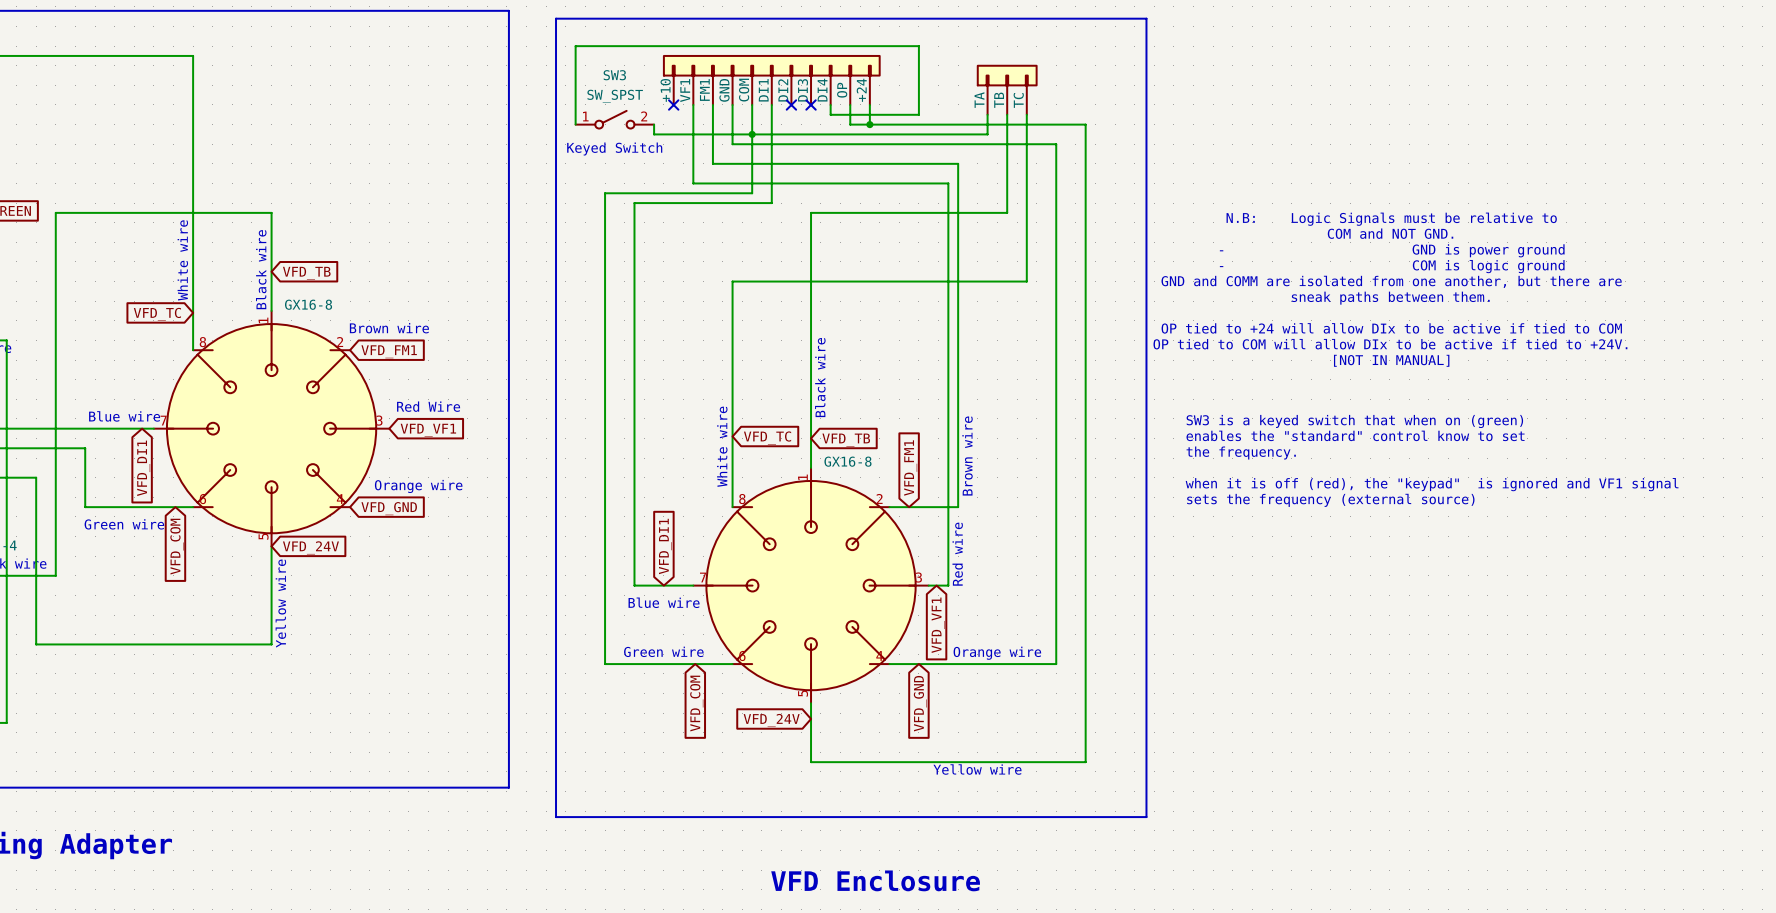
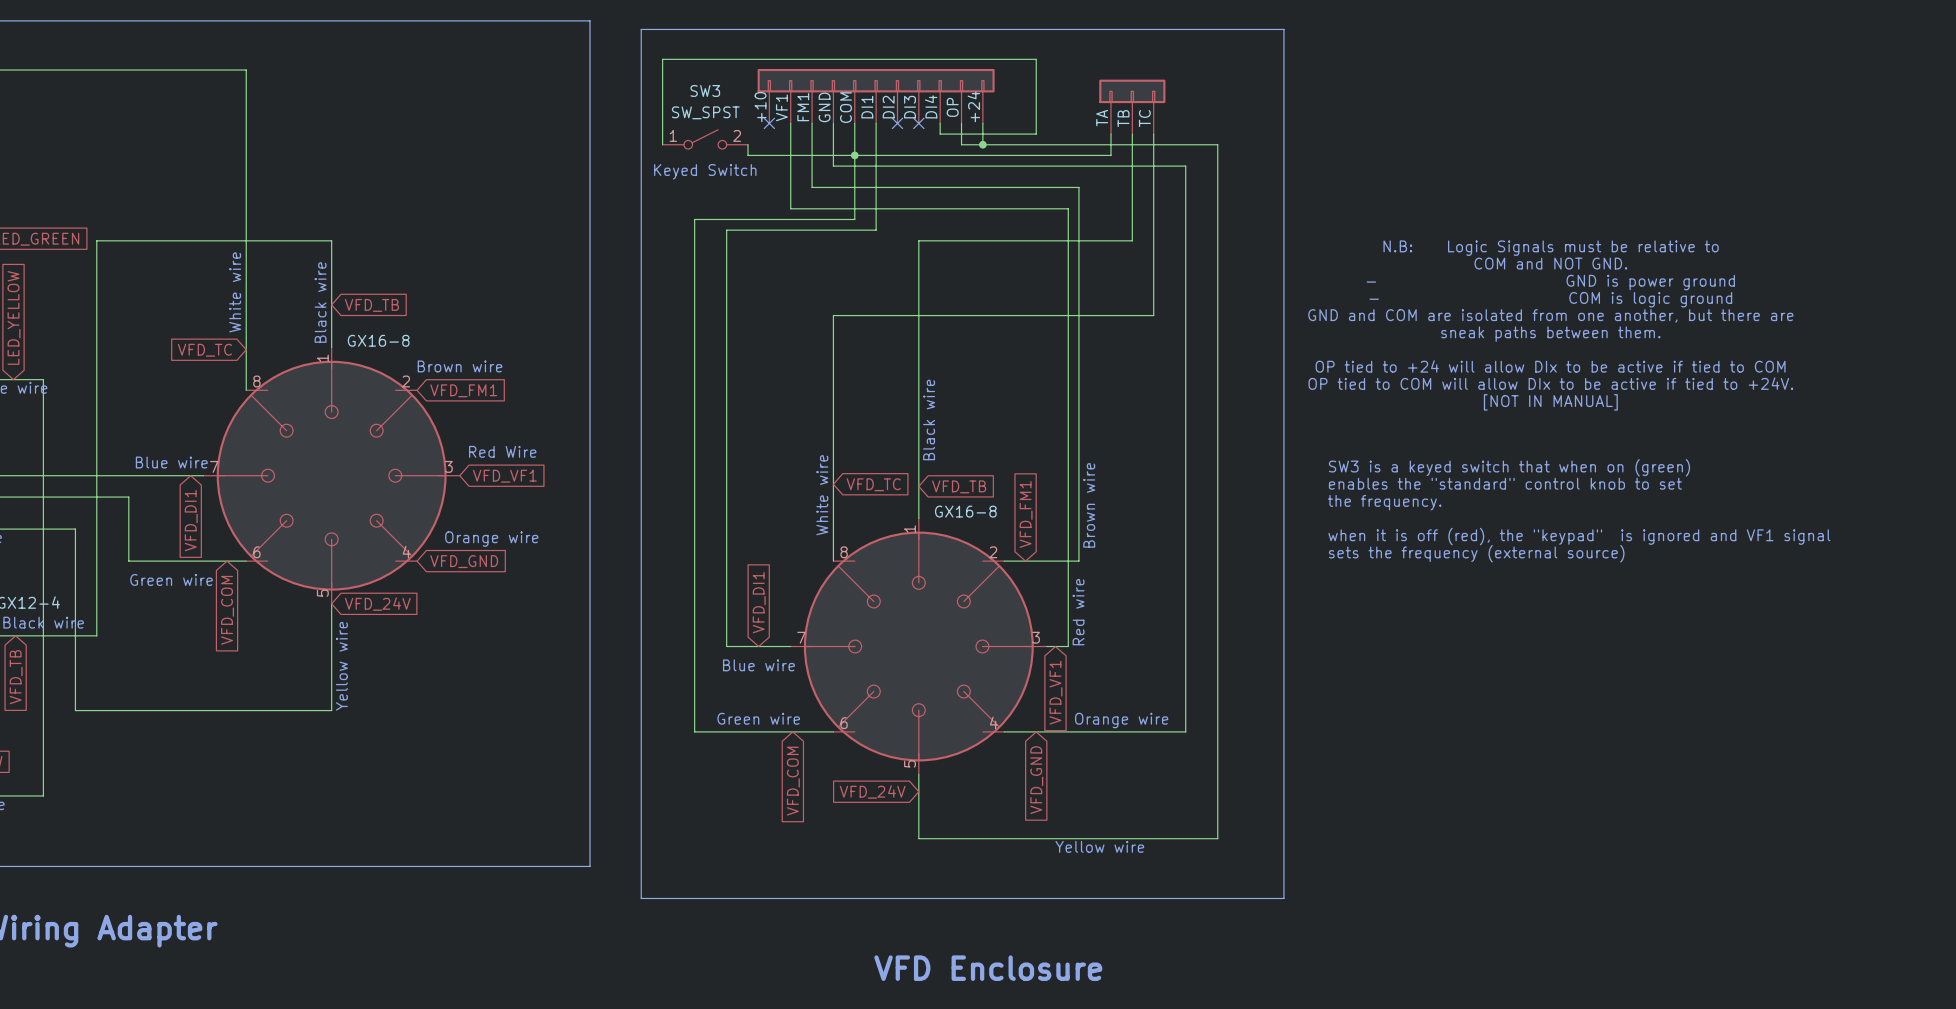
text: GND and COMM are isolated from one another, but there are (1391, 281) -> GND and COM are isolated from one another, but there are (1550, 315)
text: enables the "standard" control know to set (1355, 435) -> enables the "standard" control knob to set (1505, 483)

